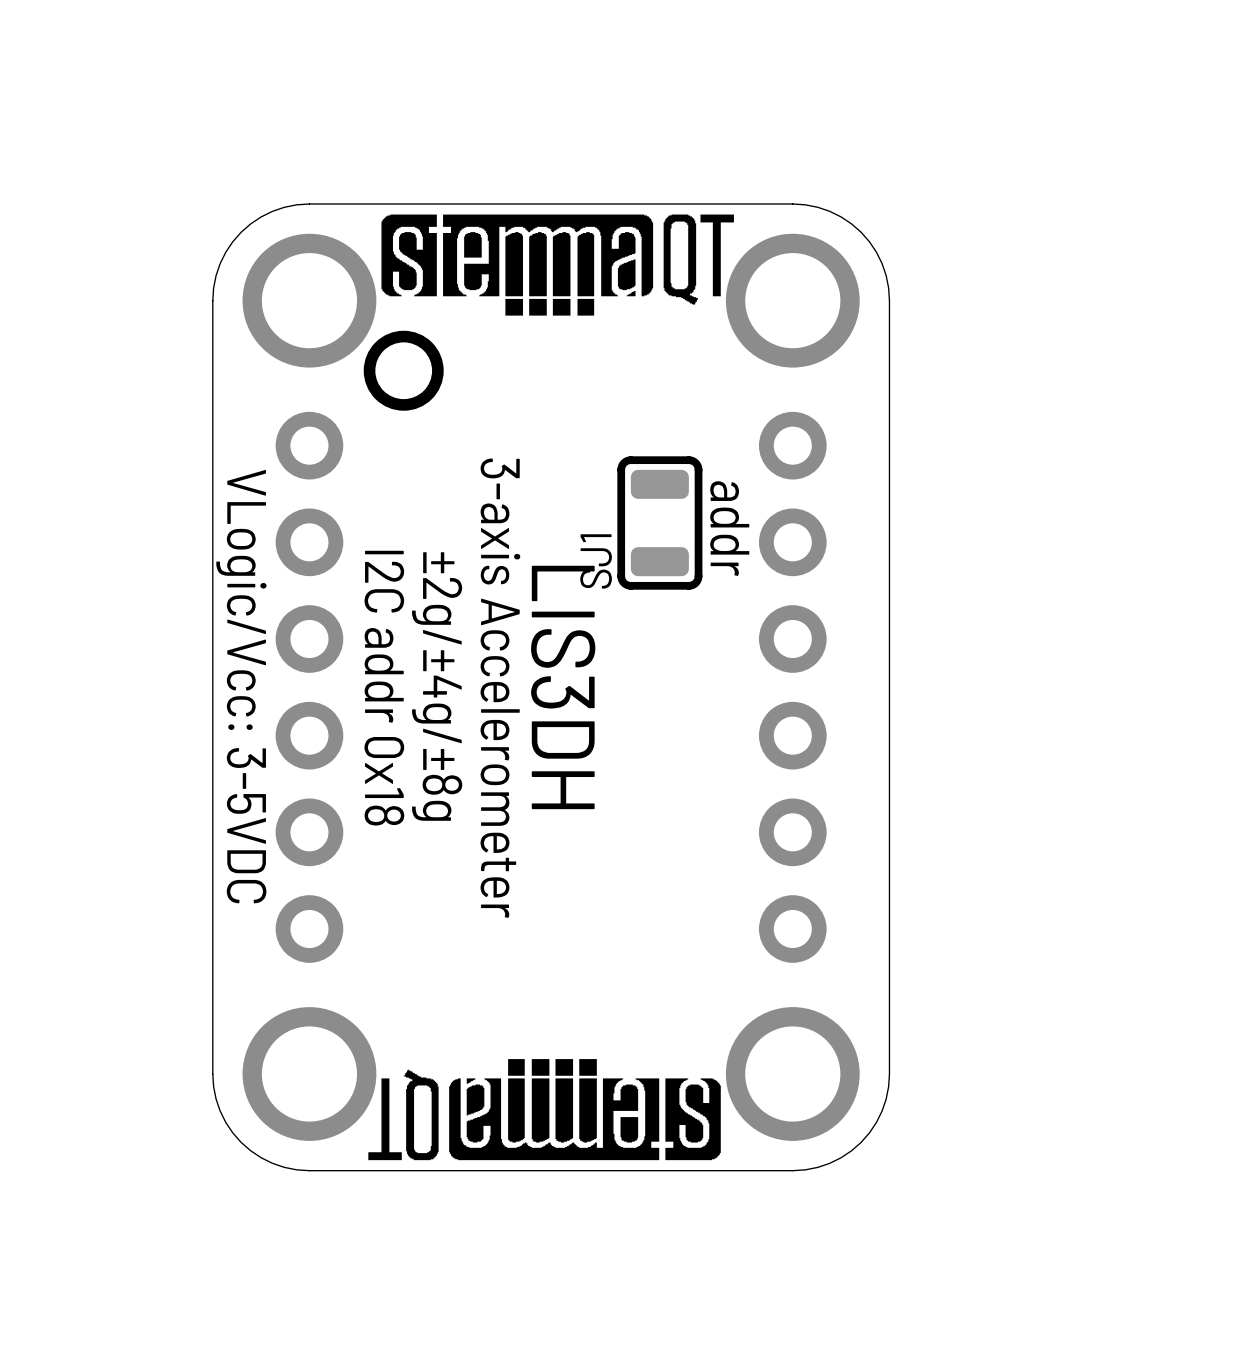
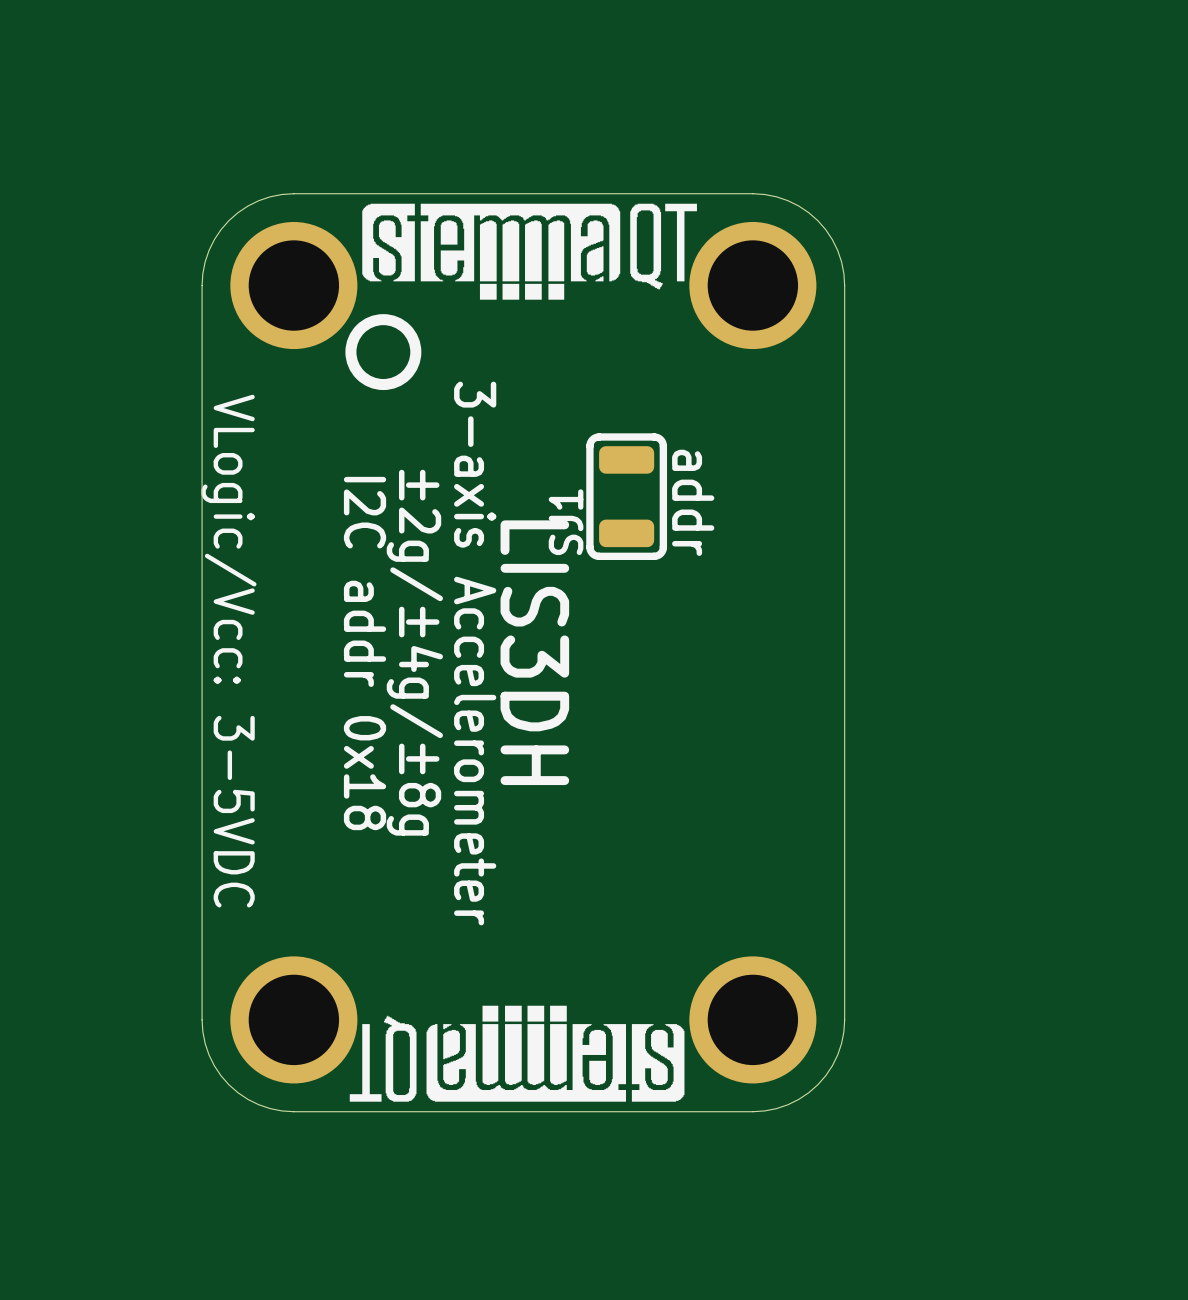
part: (309, 687) -> none
part: (792, 687) -> none

